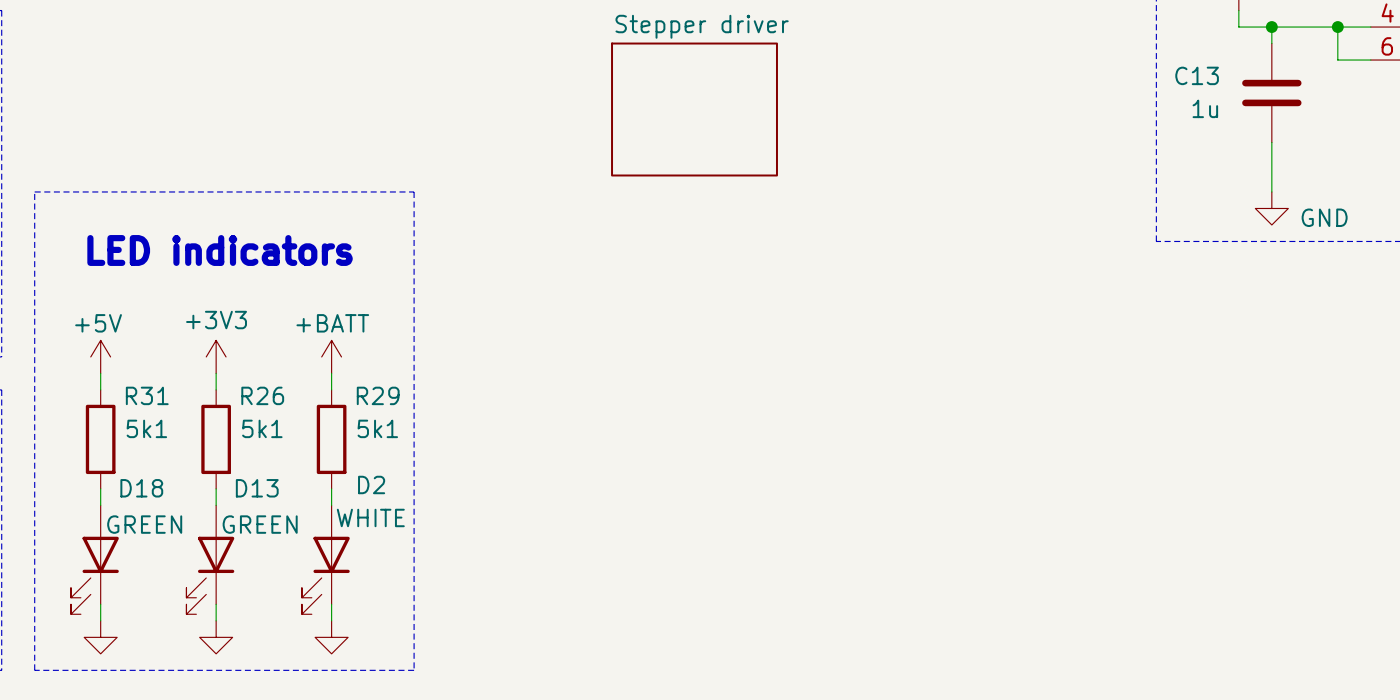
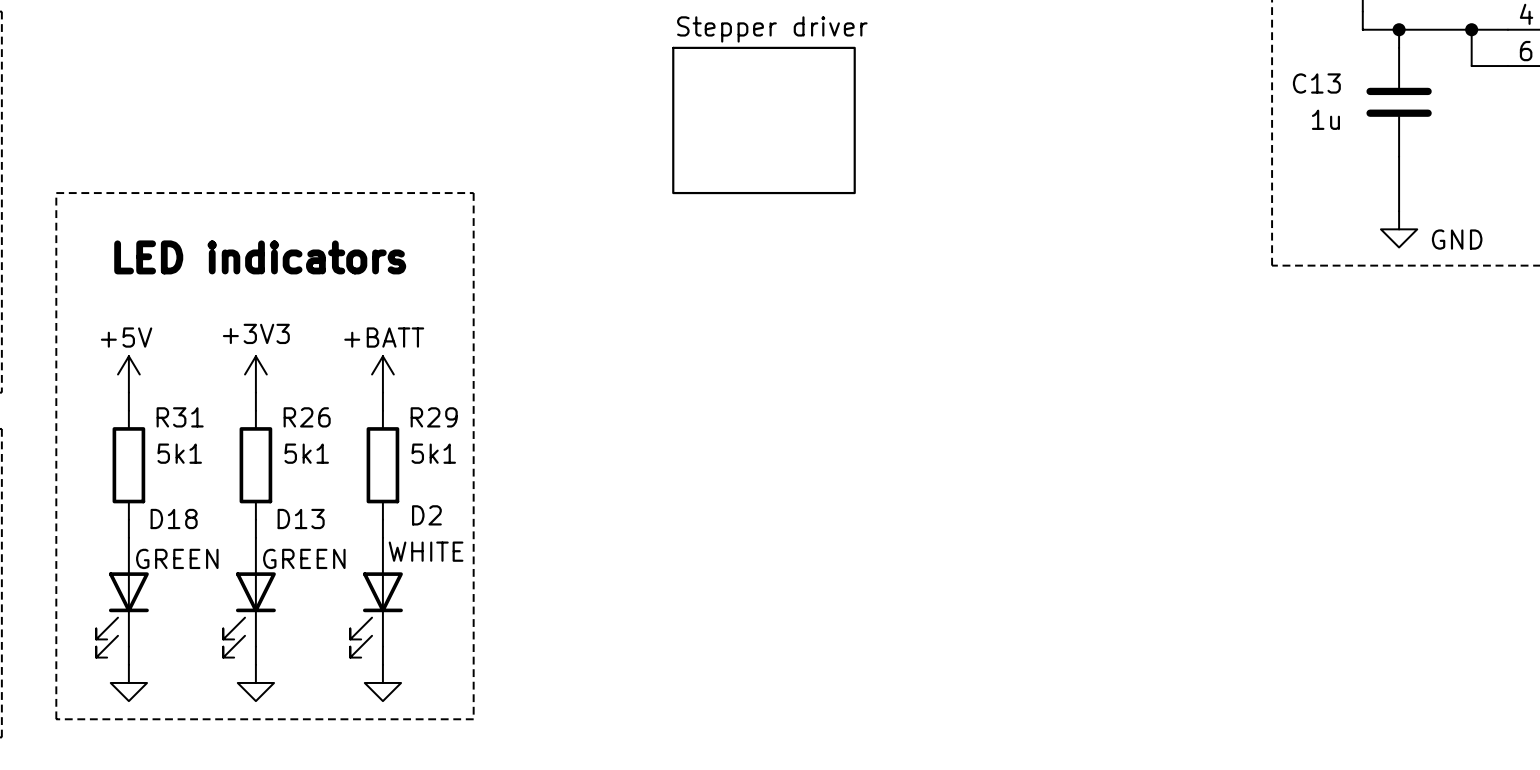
line: (34, 191) (414, 191) (414, 670) (34, 670) (34, 191) -> (56, 193) (473, 193) (473, 719) (56, 719) (56, 193)
text position: LED indicators (220, 250) -> LED indicators (260, 257)
power symbol position: +5V (100, 356) -> +5V (128, 374)
power symbol position: +3V3 (216, 356) -> +3V3 (255, 374)
power symbol position: +BATT (331, 356) -> +BATT (382, 374)
wire: (100, 373) (100, 389) -> (128, 392) (128, 410)
wire: (216, 373) (216, 389) -> (255, 392) (255, 410)
wire: (331, 373) (331, 389) -> (382, 392) (382, 410)
R31 position: (100, 439) -> (128, 465)
R26 position: (216, 439) -> (255, 465)
R29 position: (331, 439) -> (382, 465)
wire: (100, 488) (100, 505) -> (128, 519) (128, 537)
wire: (216, 488) (216, 505) -> (255, 519) (255, 537)
wire: (331, 488) (331, 505) -> (382, 519) (382, 537)
D18 position: (94, 559) -> (122, 597)
D13 position: (210, 559) -> (249, 597)
D2 position: (325, 559) -> (376, 597)
wire: (100, 604) (100, 620) -> (128, 646) (128, 664)
wire: (216, 604) (216, 620) -> (255, 646) (255, 664)
wire: (331, 604) (331, 620) -> (382, 646) (382, 664)
power symbol position: (100, 637) -> (128, 682)
power symbol position: (216, 637) -> (255, 682)
power symbol position: (331, 637) -> (382, 682)

